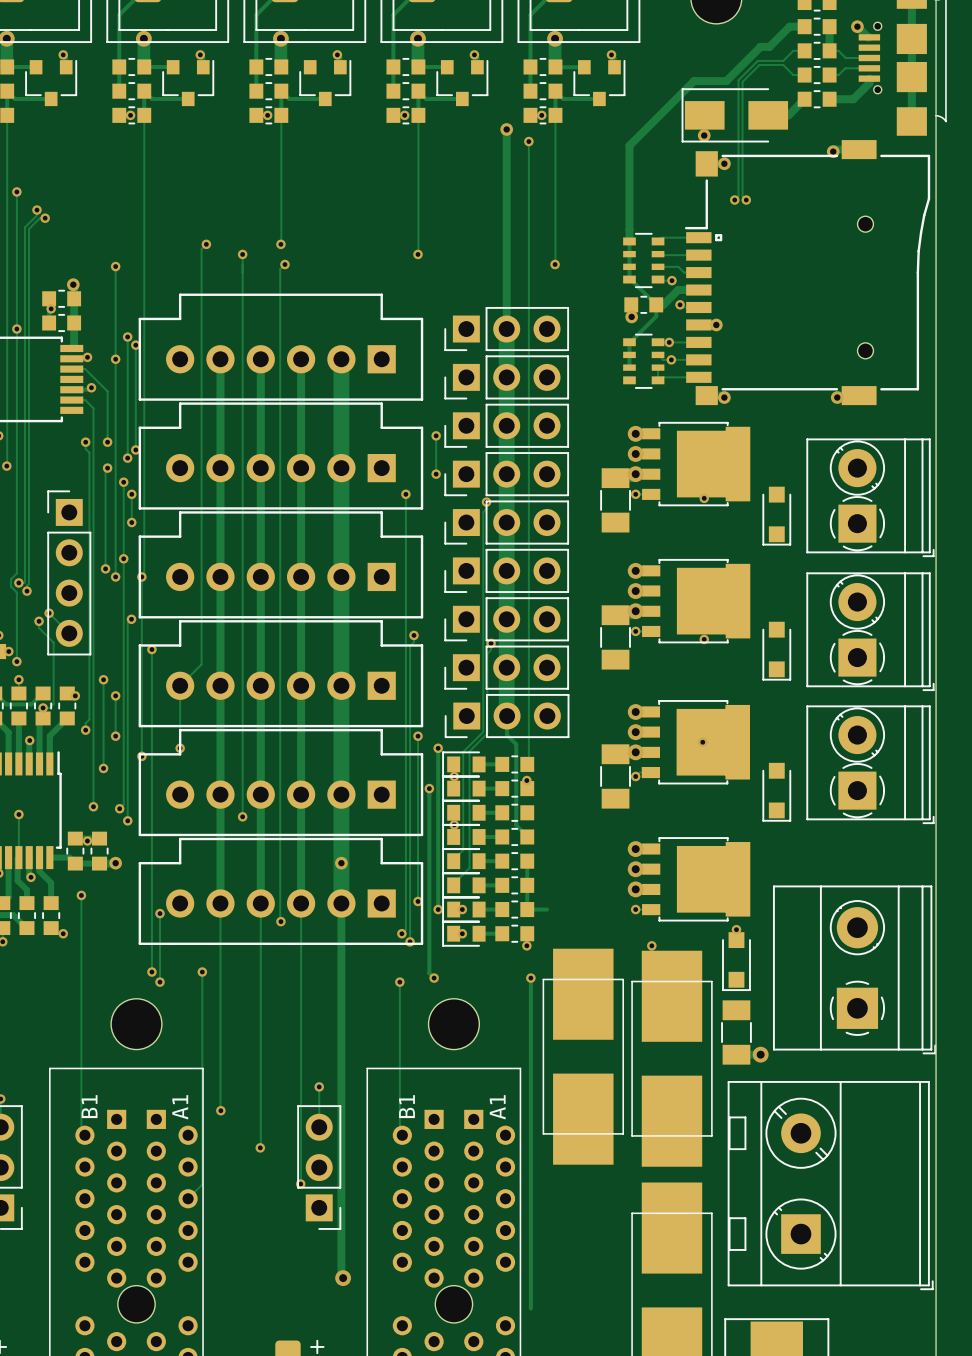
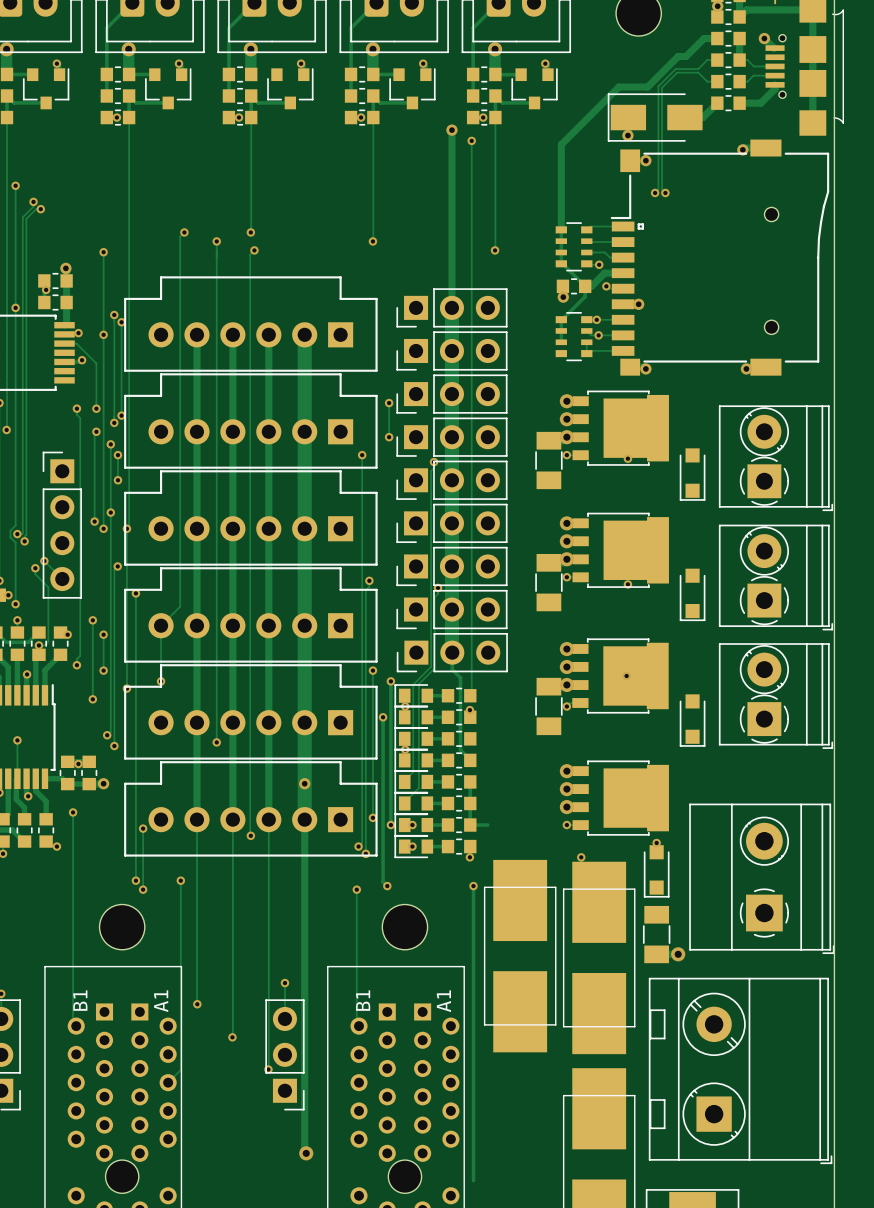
track: (71, 400) (85, 400) (93, 408) (93, 806) -> none
via: (93, 806) -> none

